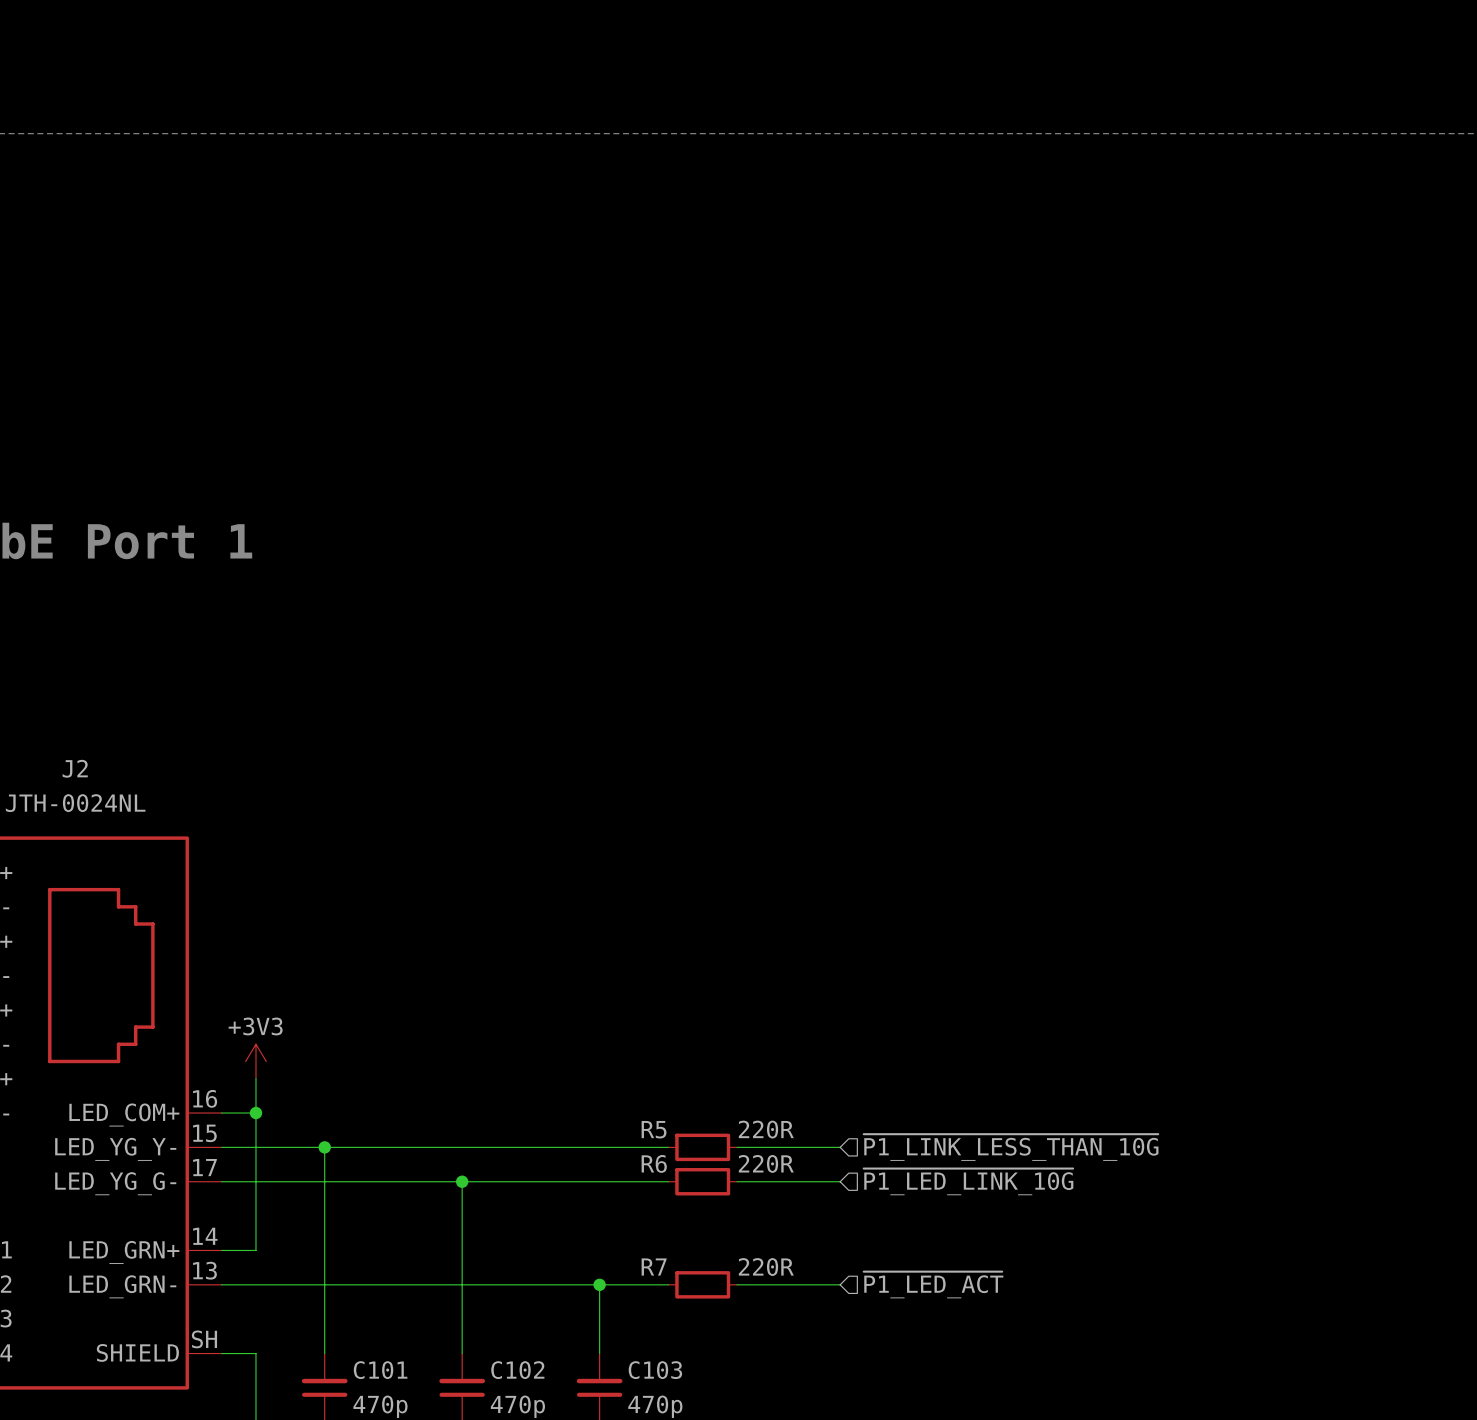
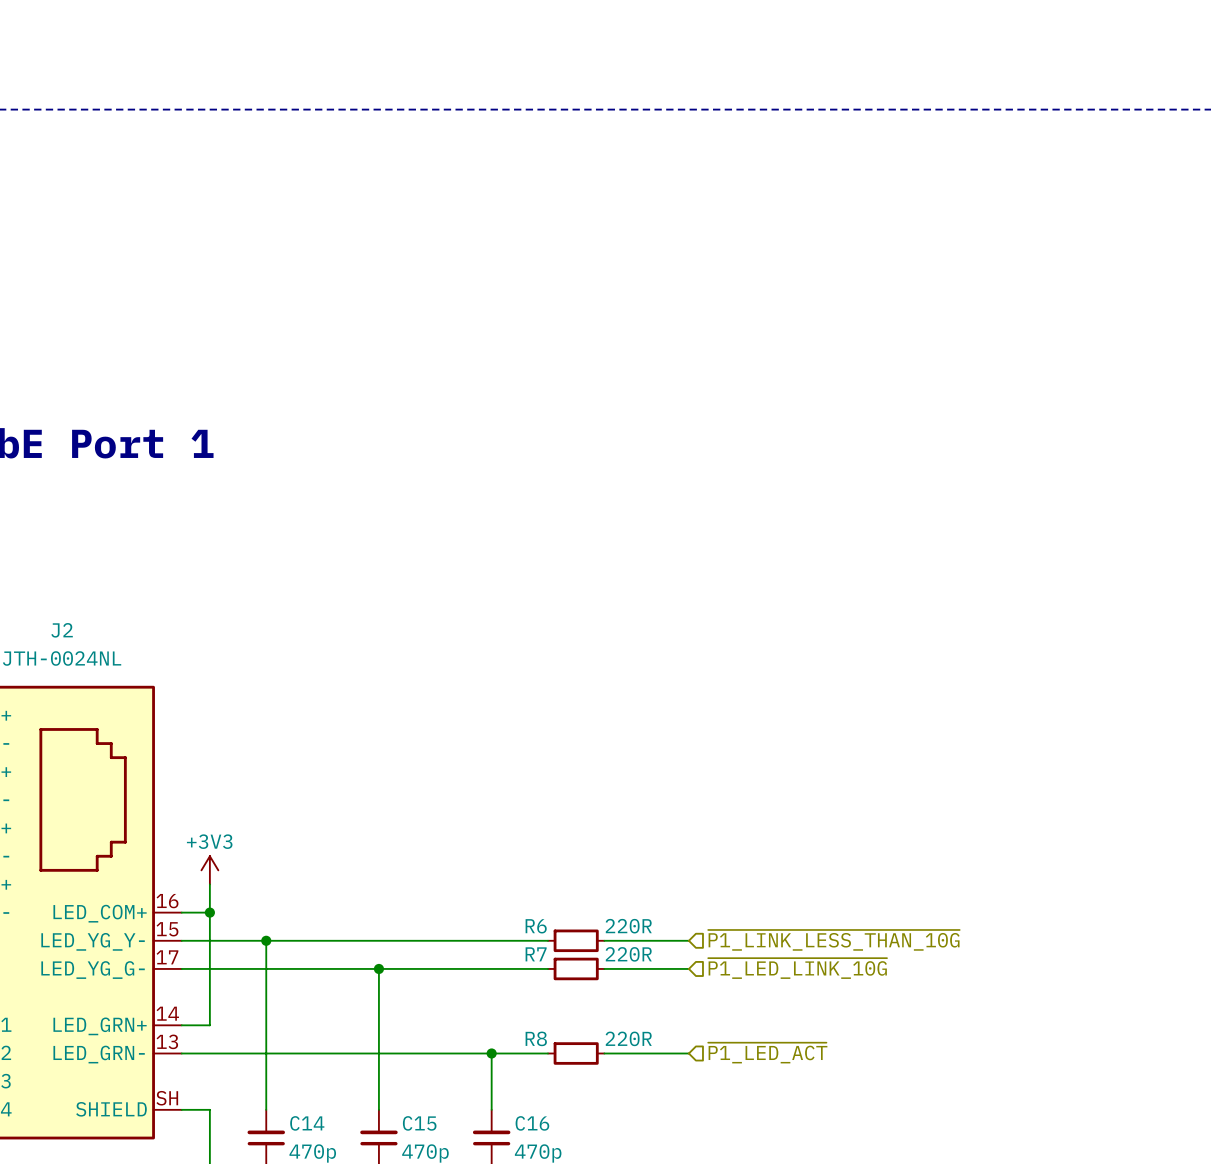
R5 name: R5 (654, 1129) -> R6 (536, 926)
R6 name: R6 (654, 1163) -> R7 (536, 954)
R7 name: R7 (654, 1267) -> R8 (536, 1038)
C101 name: C101 (380, 1370) -> C14 (307, 1123)
C102 name: C102 (517, 1370) -> C15 (419, 1123)
C103 name: C103 (655, 1370) -> C16 (532, 1123)

